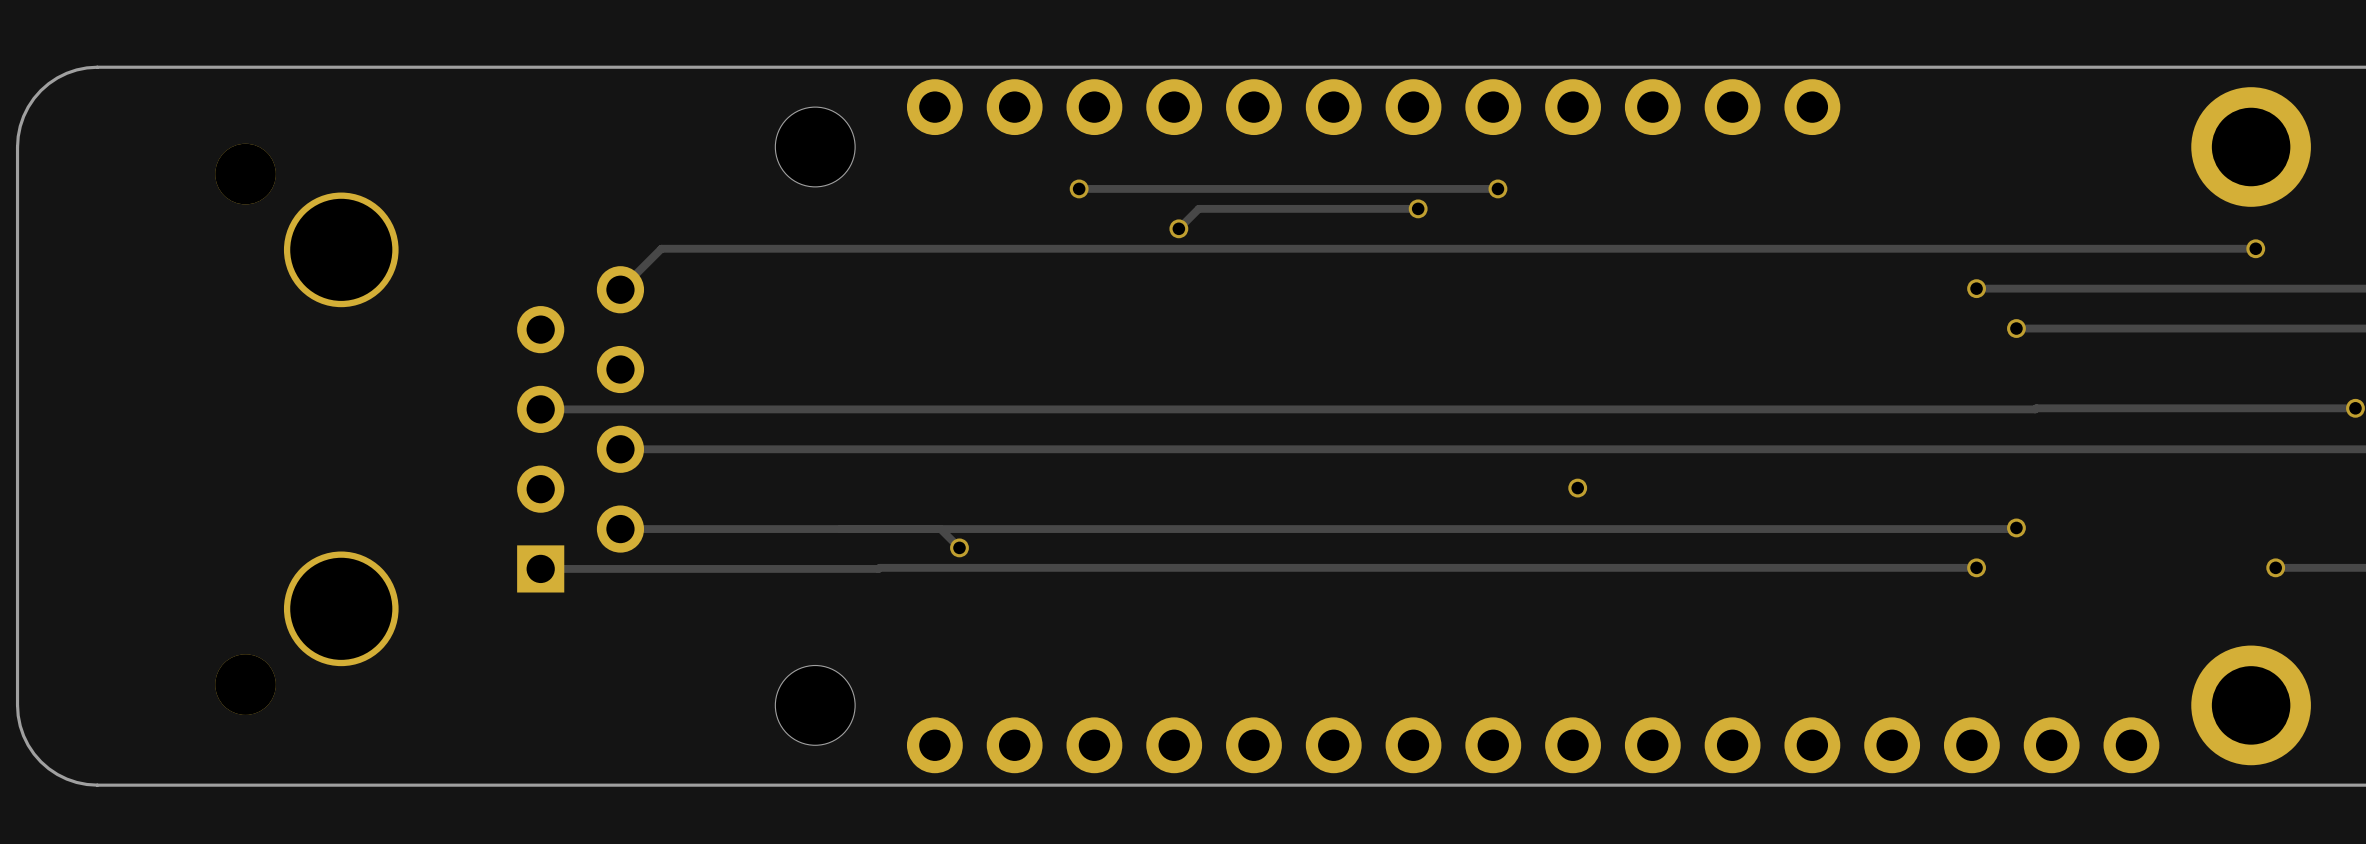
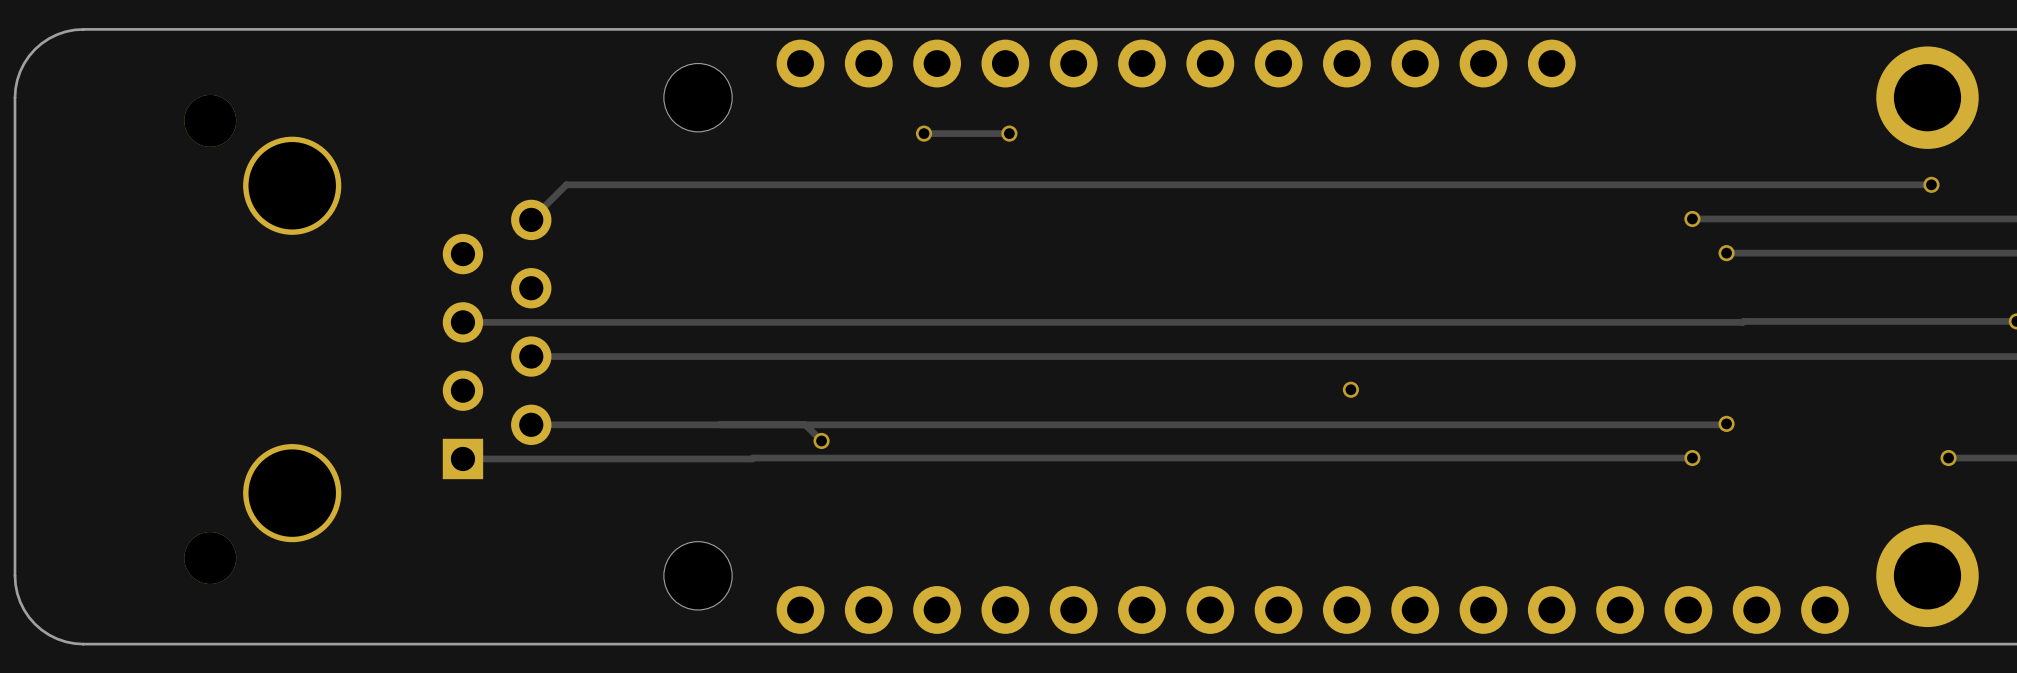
track: (1497, 188) (1178, 188) -> none
via: (1497, 188) -> none
track: (1418, 208) (1198, 208) (1178, 228) -> none
via: (1418, 208) -> none
via position: (1178, 228) -> (1009, 133)

